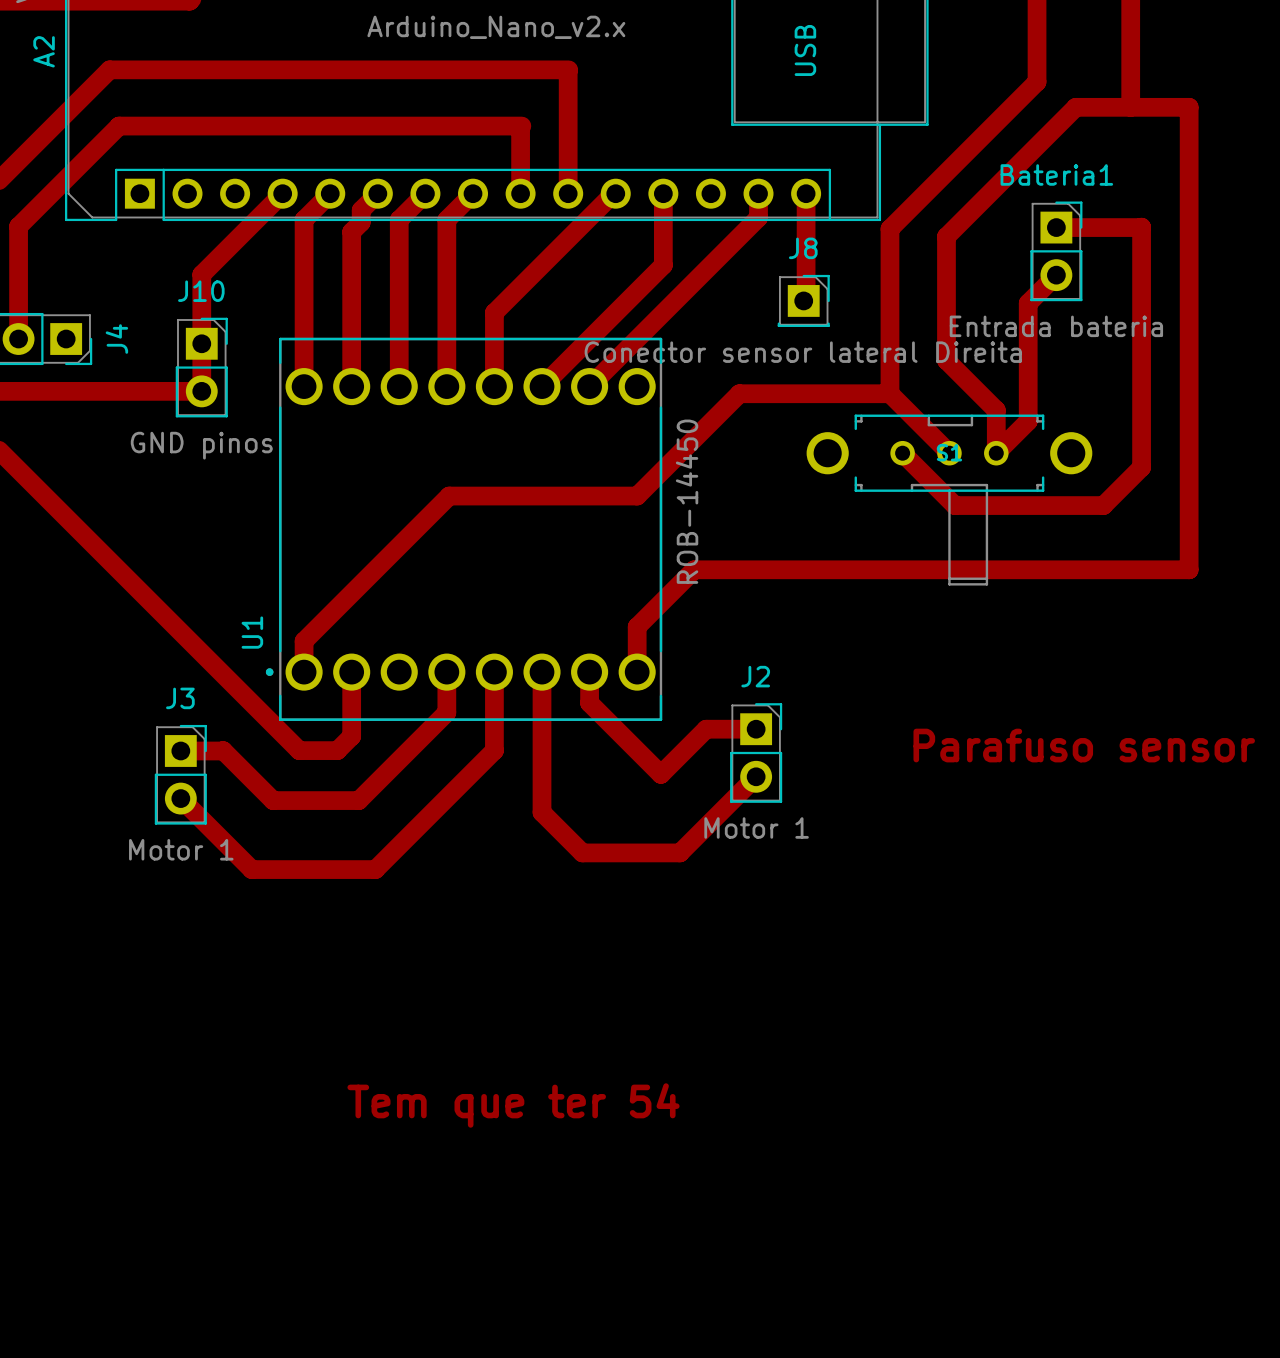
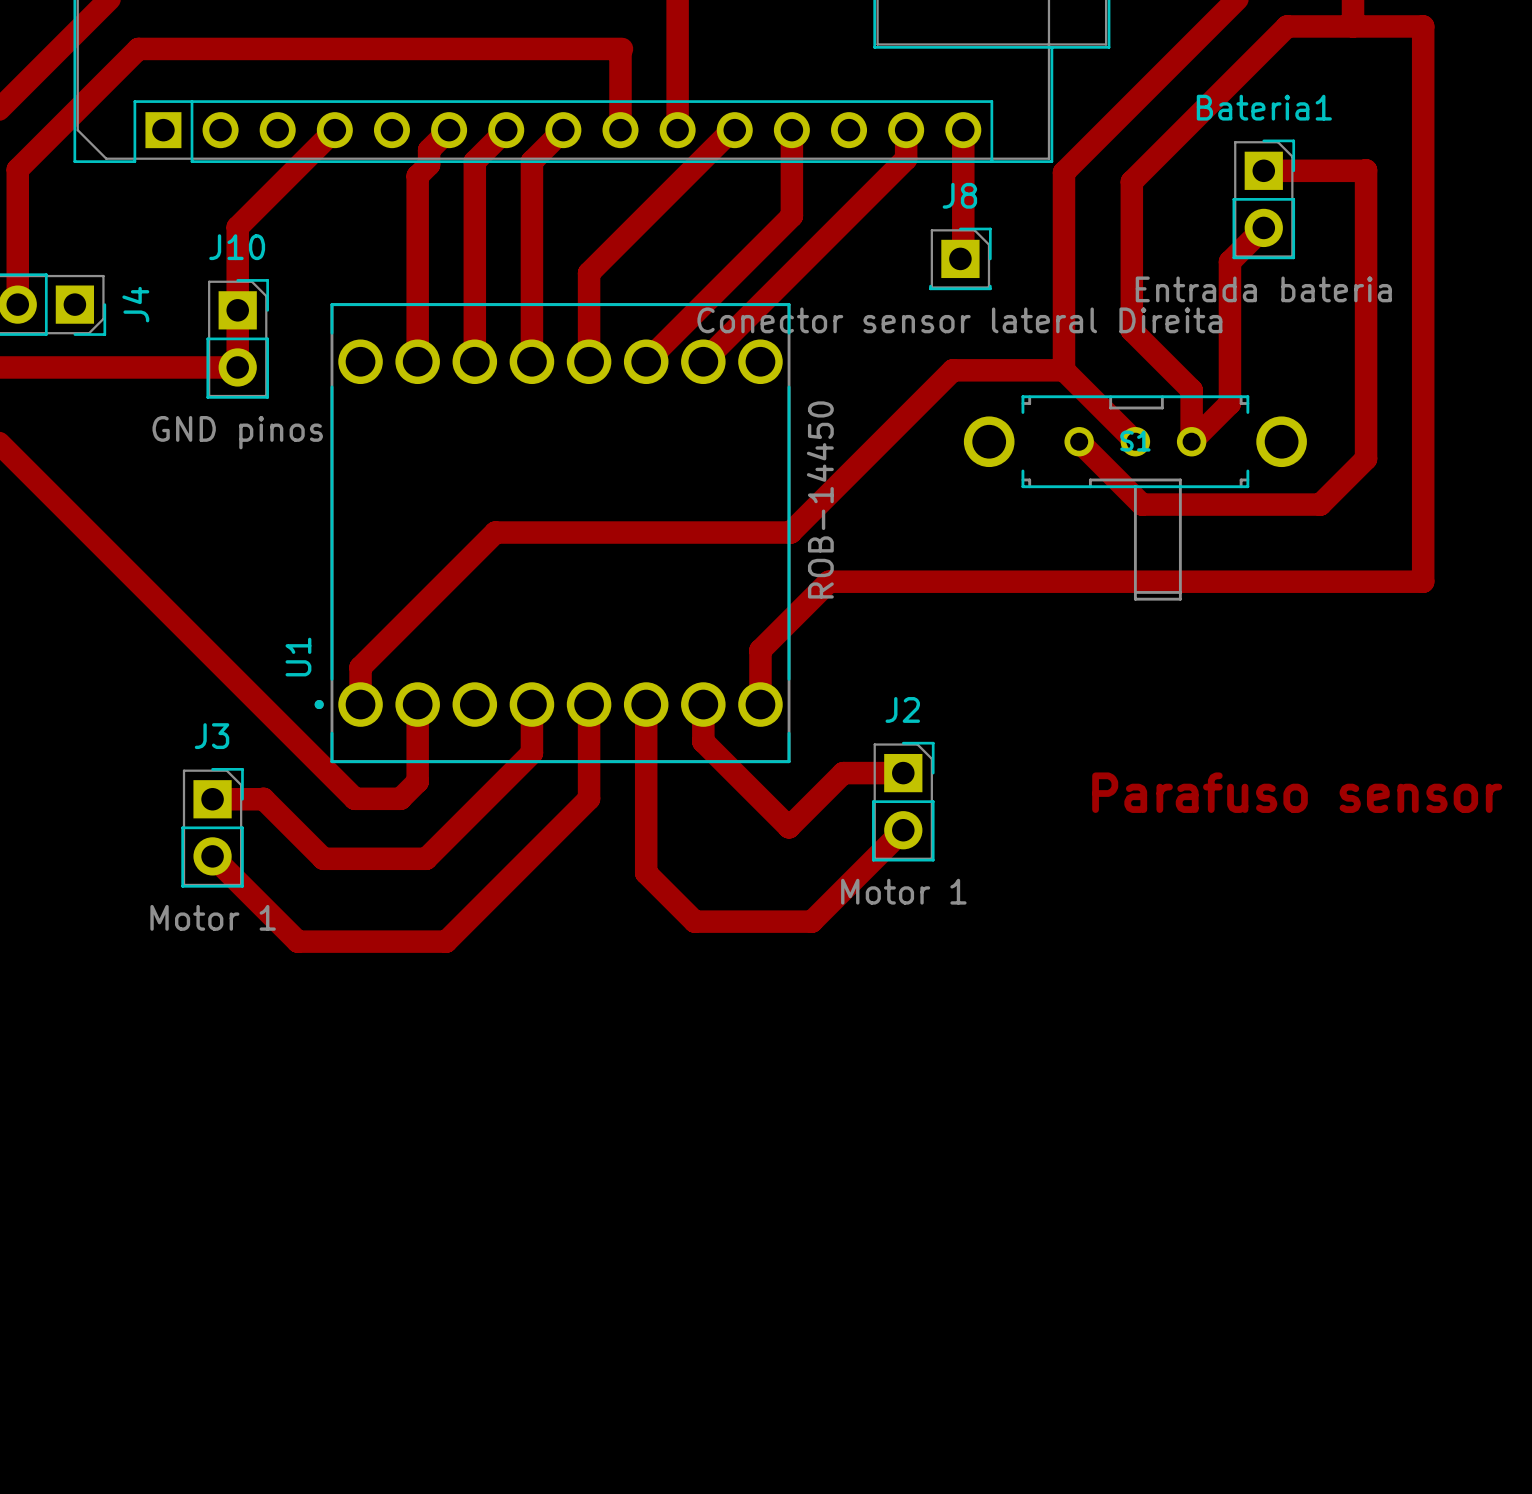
top track: (330, 193) (304, 219) (304, 386) -> none
top track: (797, 393) (739, 393) (637, 496) (449, 496) (416, 528) -> (952, 370) (790, 532) (495, 532)
text: Tem que ter 54 (513, 1105) -> none

